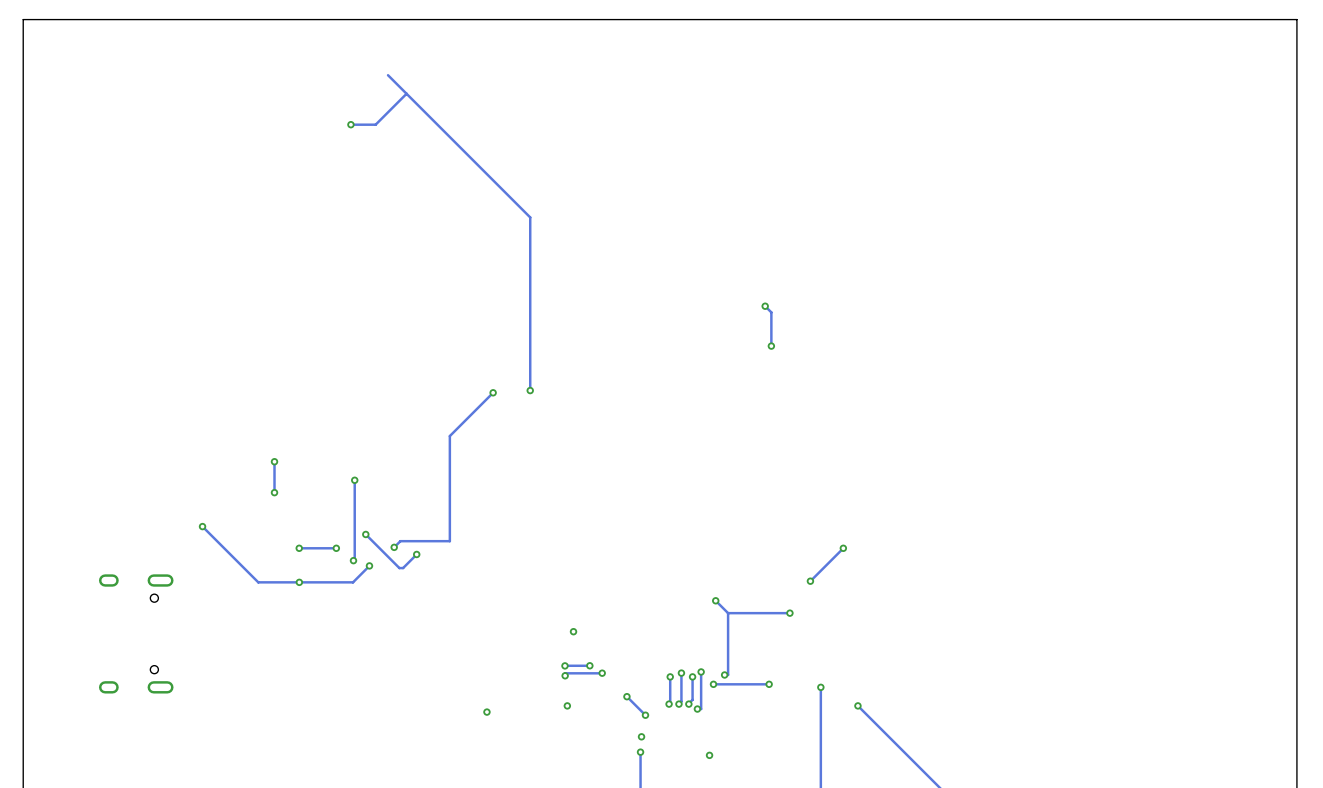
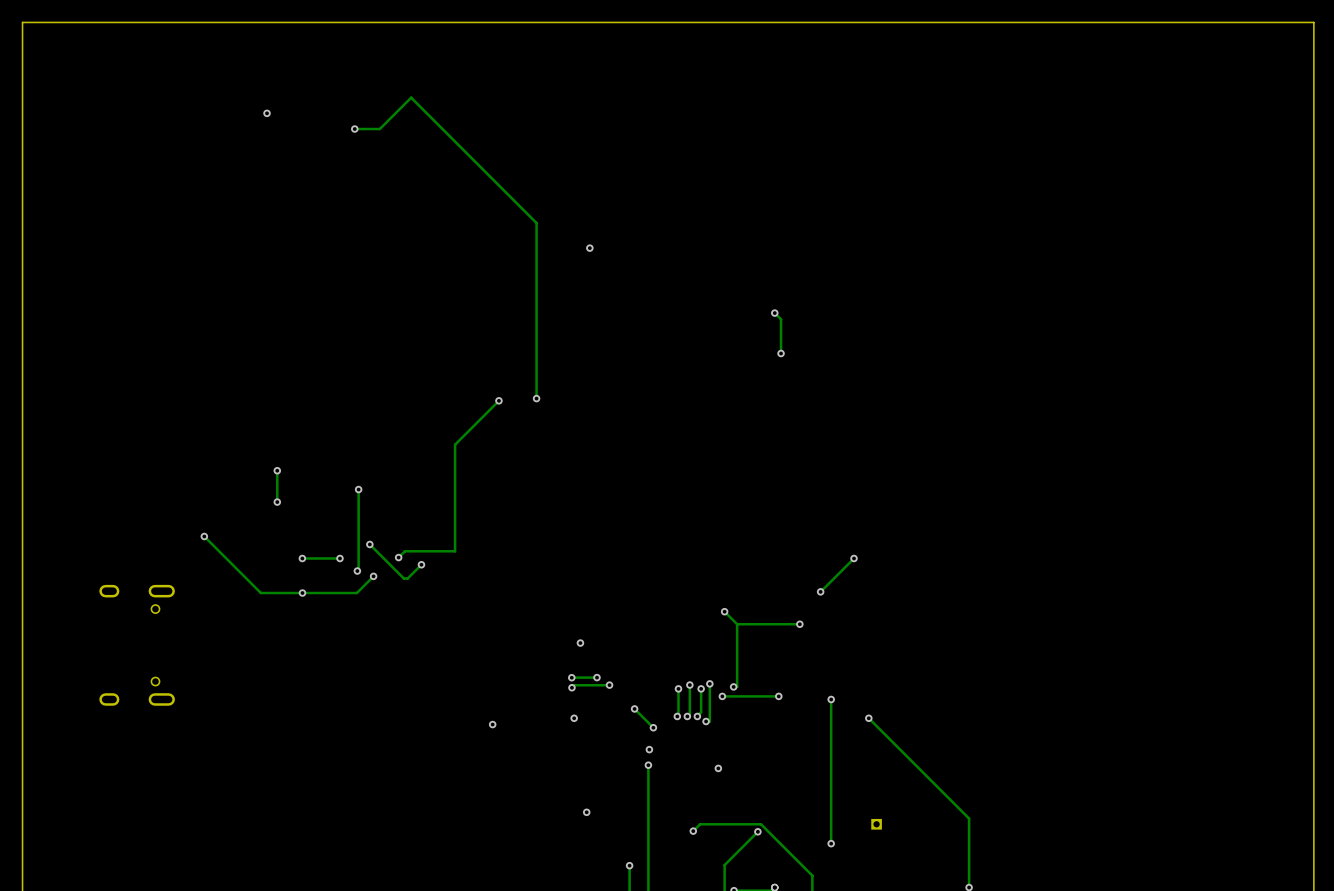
track: (388, 75) (406, 93) -> none
via: none -> (267, 113)
via: none -> (589, 248)

